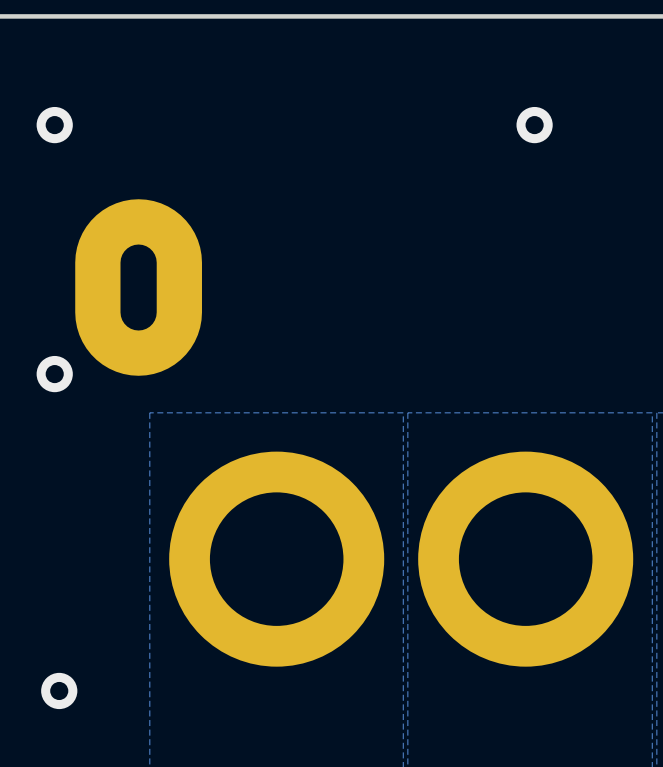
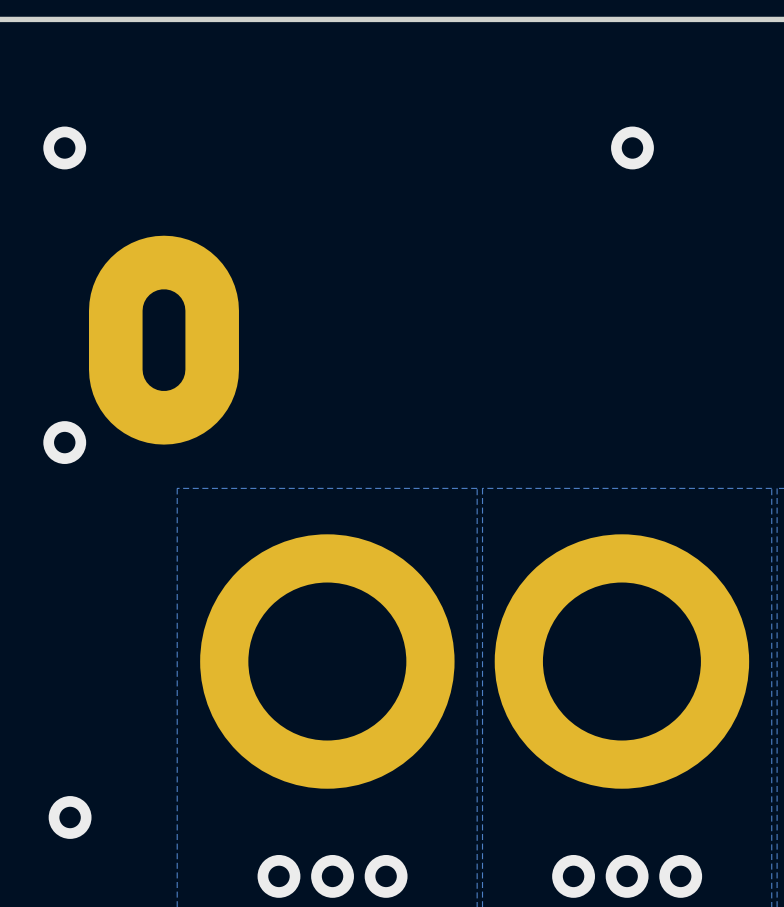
via: none -> (278, 876)
via: none -> (332, 876)
via: none -> (386, 876)
via: none -> (573, 876)
via: none -> (627, 876)
via: none -> (680, 876)

